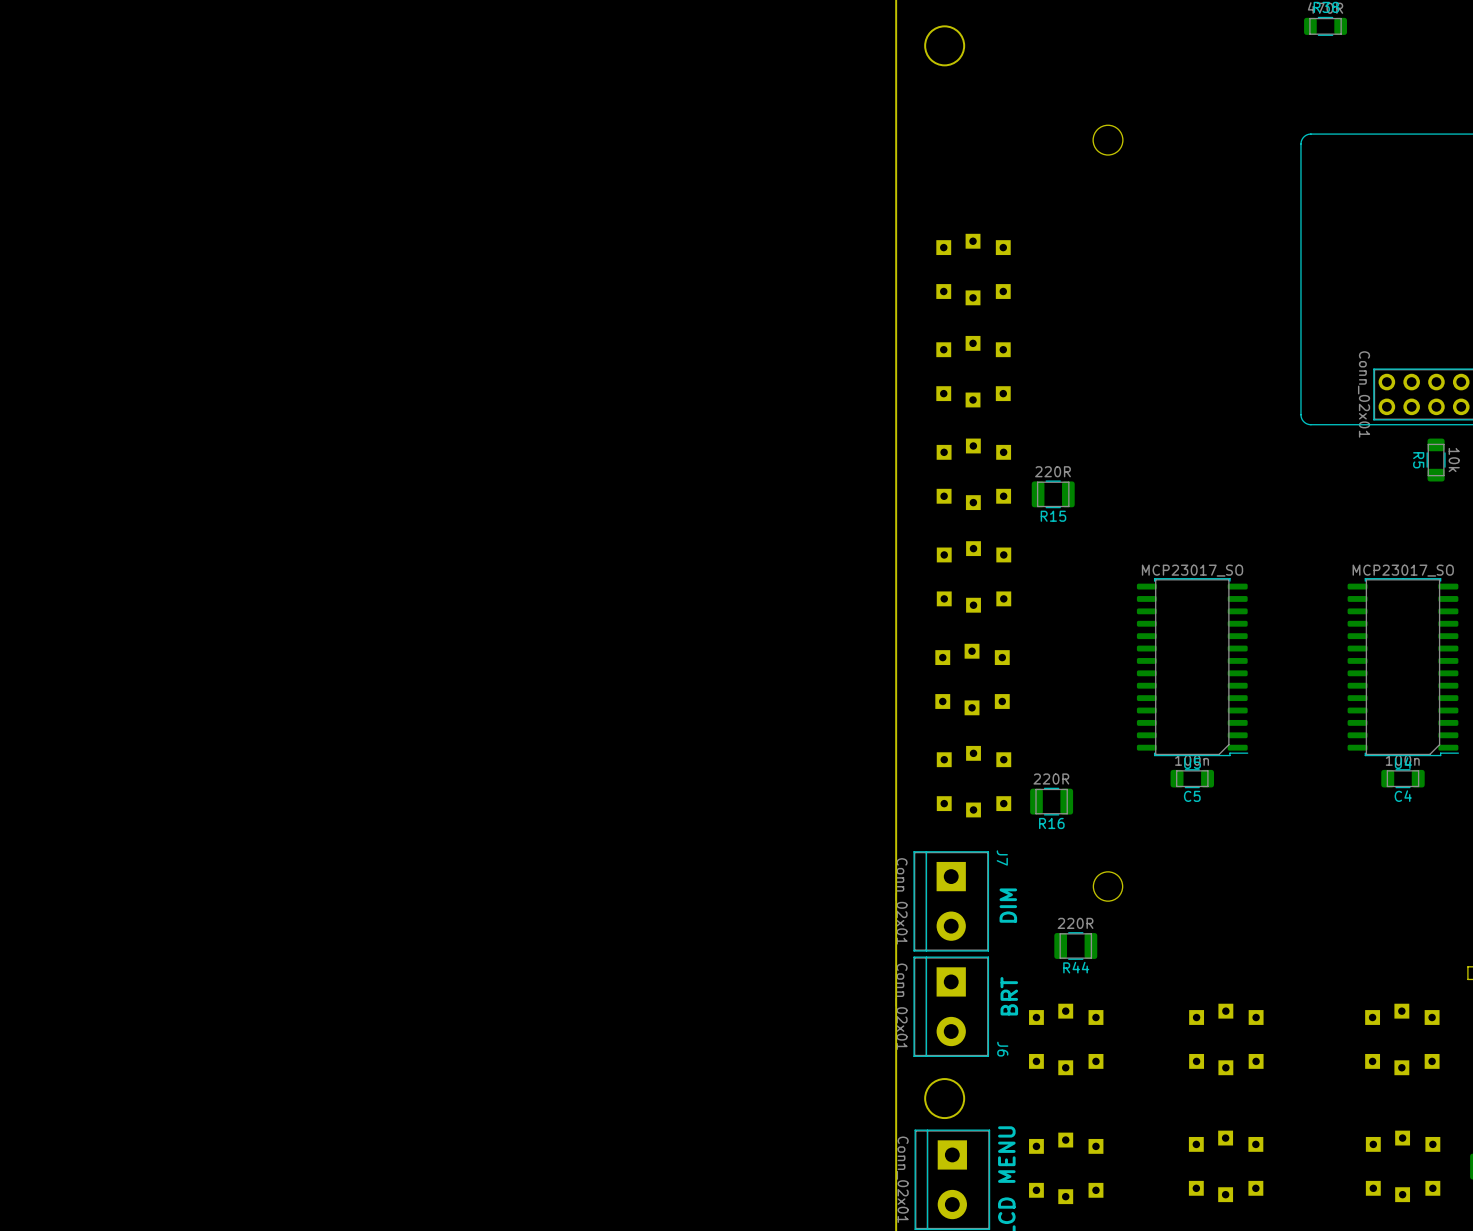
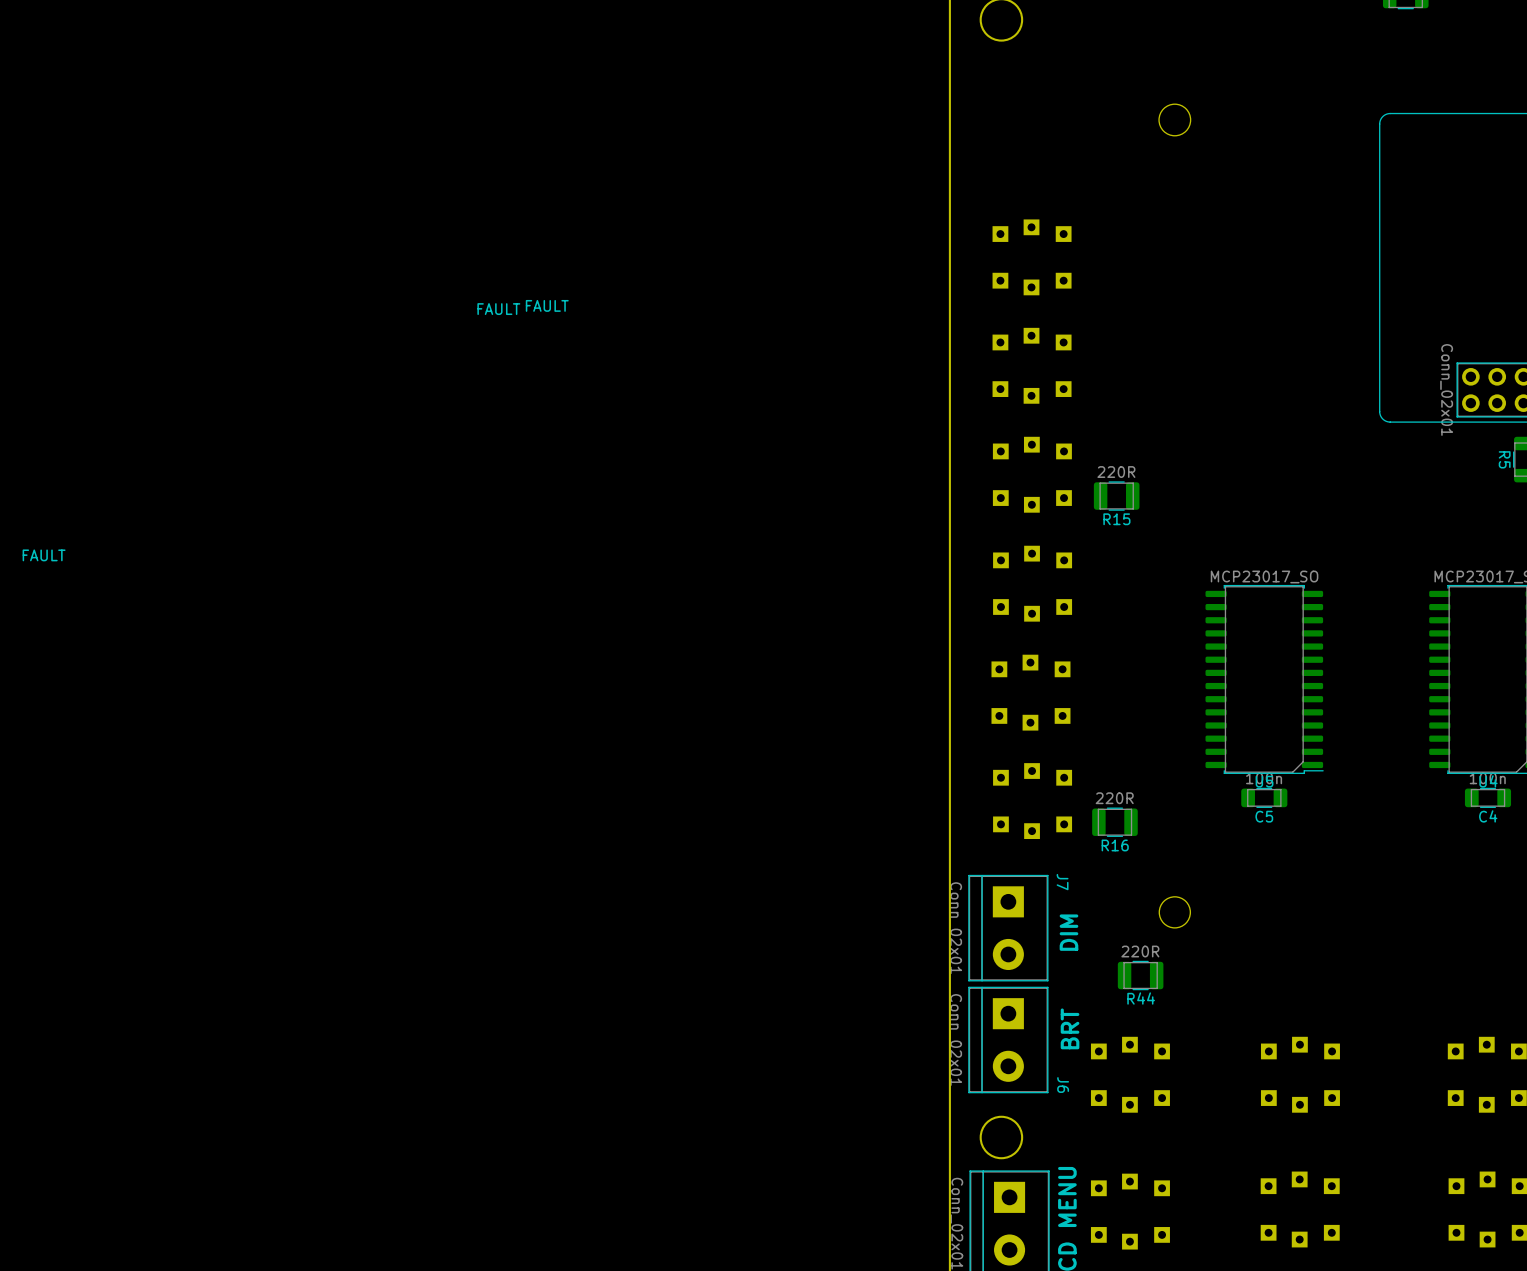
drawing: none -> [477, 299, 569, 316]
drawing: none -> [22, 549, 66, 562]

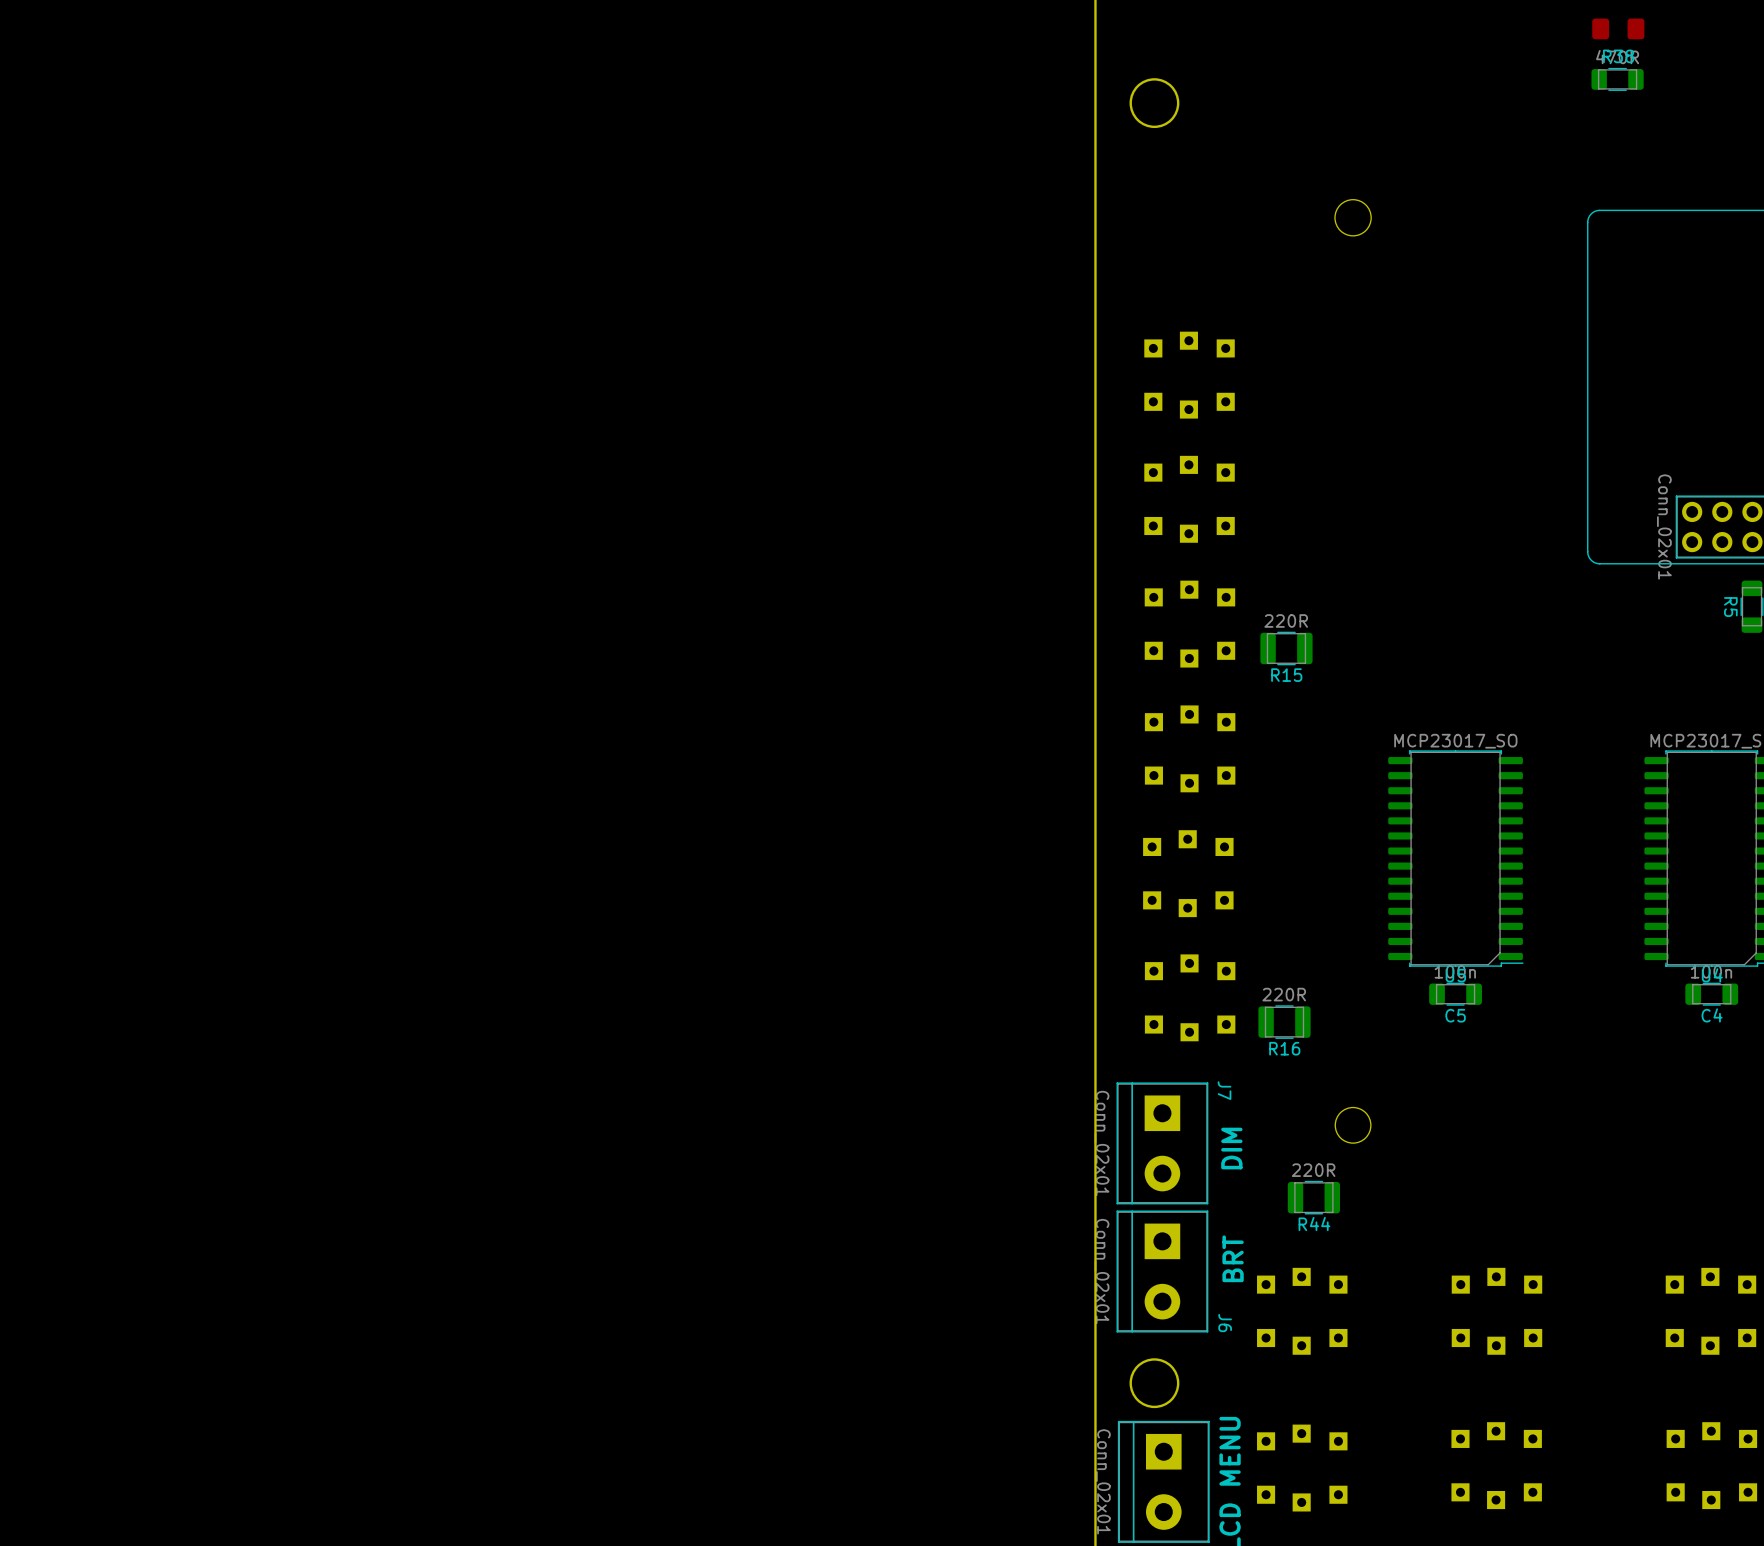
drawing: [477, 299, 569, 316] -> none
drawing: [22, 549, 66, 562] -> none

